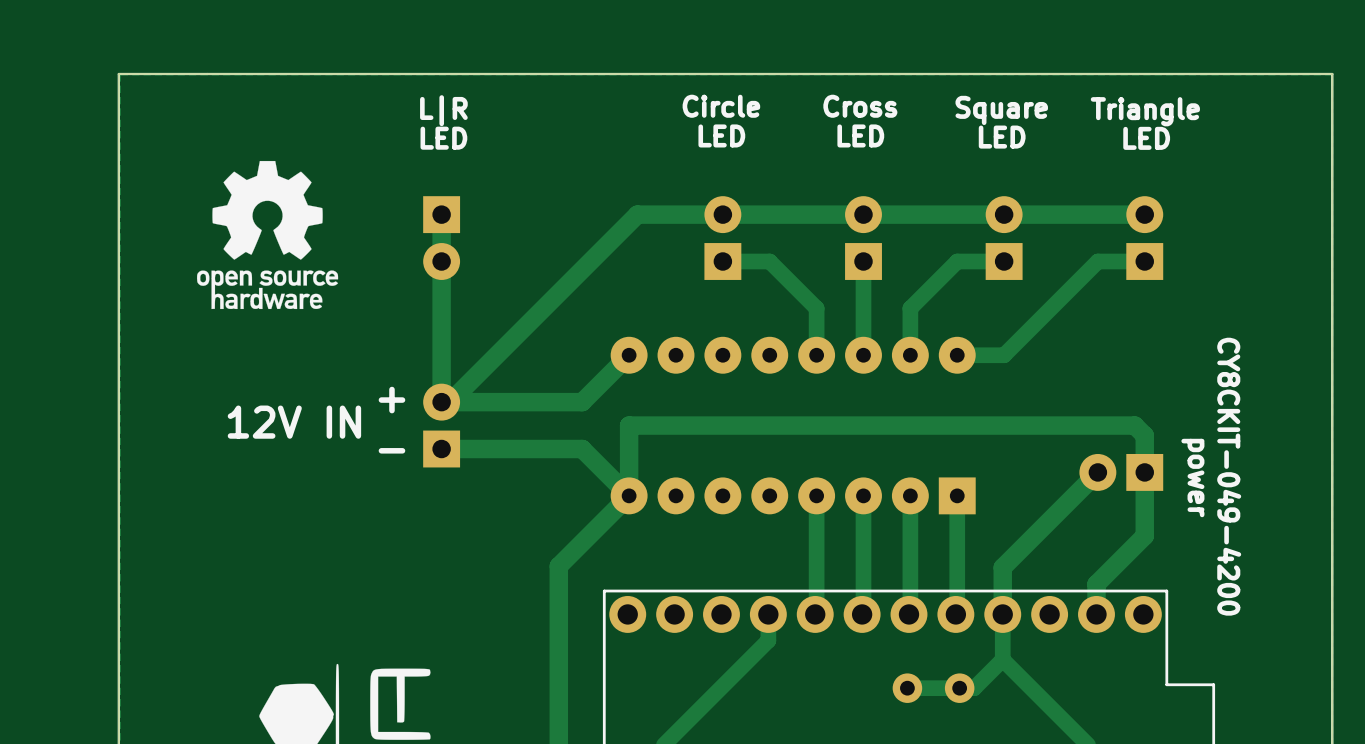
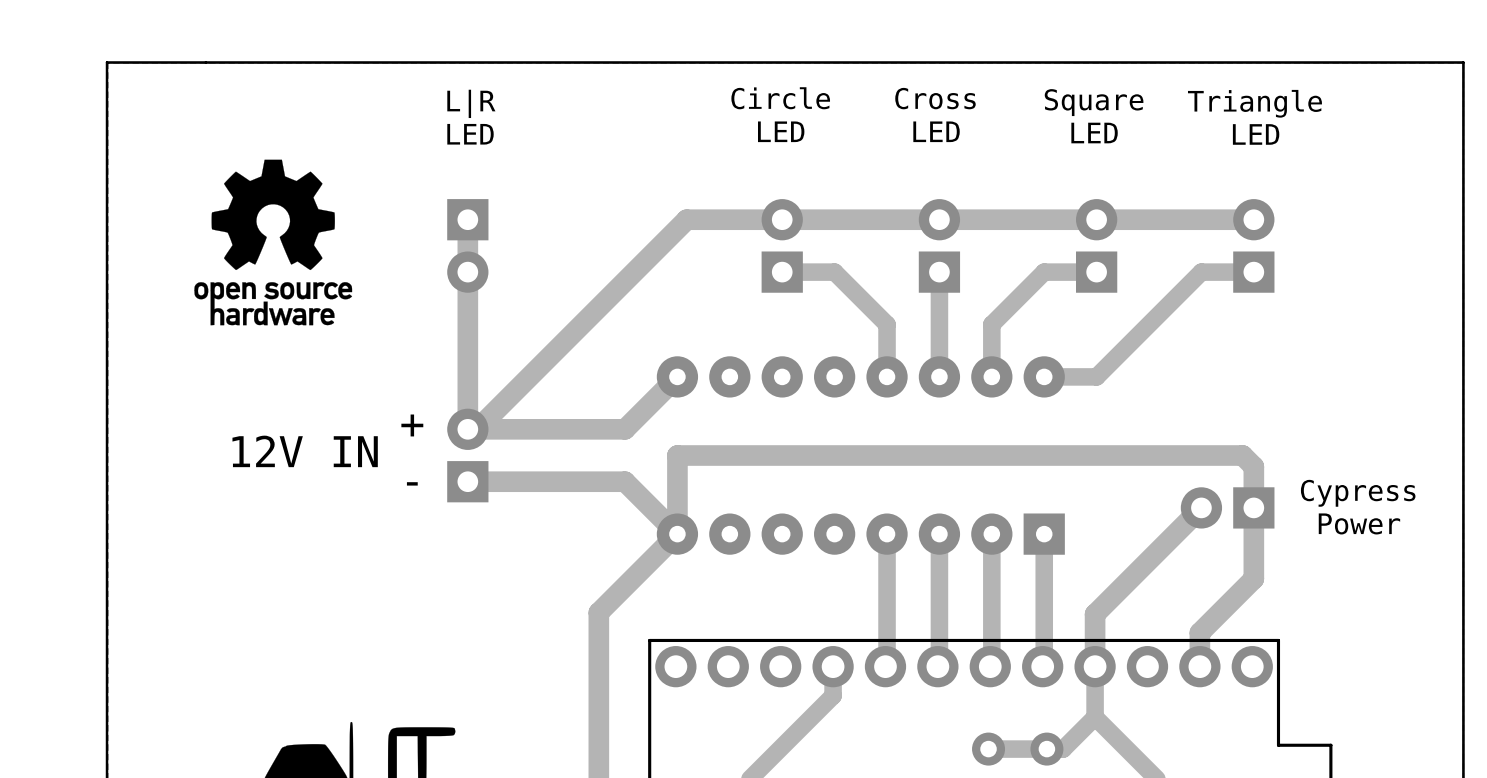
text: none -> Cypress (1358, 493)
text: CY8CKIT-049-4200 (1229, 476) -> none
text: power (1192, 478) -> Power (1359, 523)

